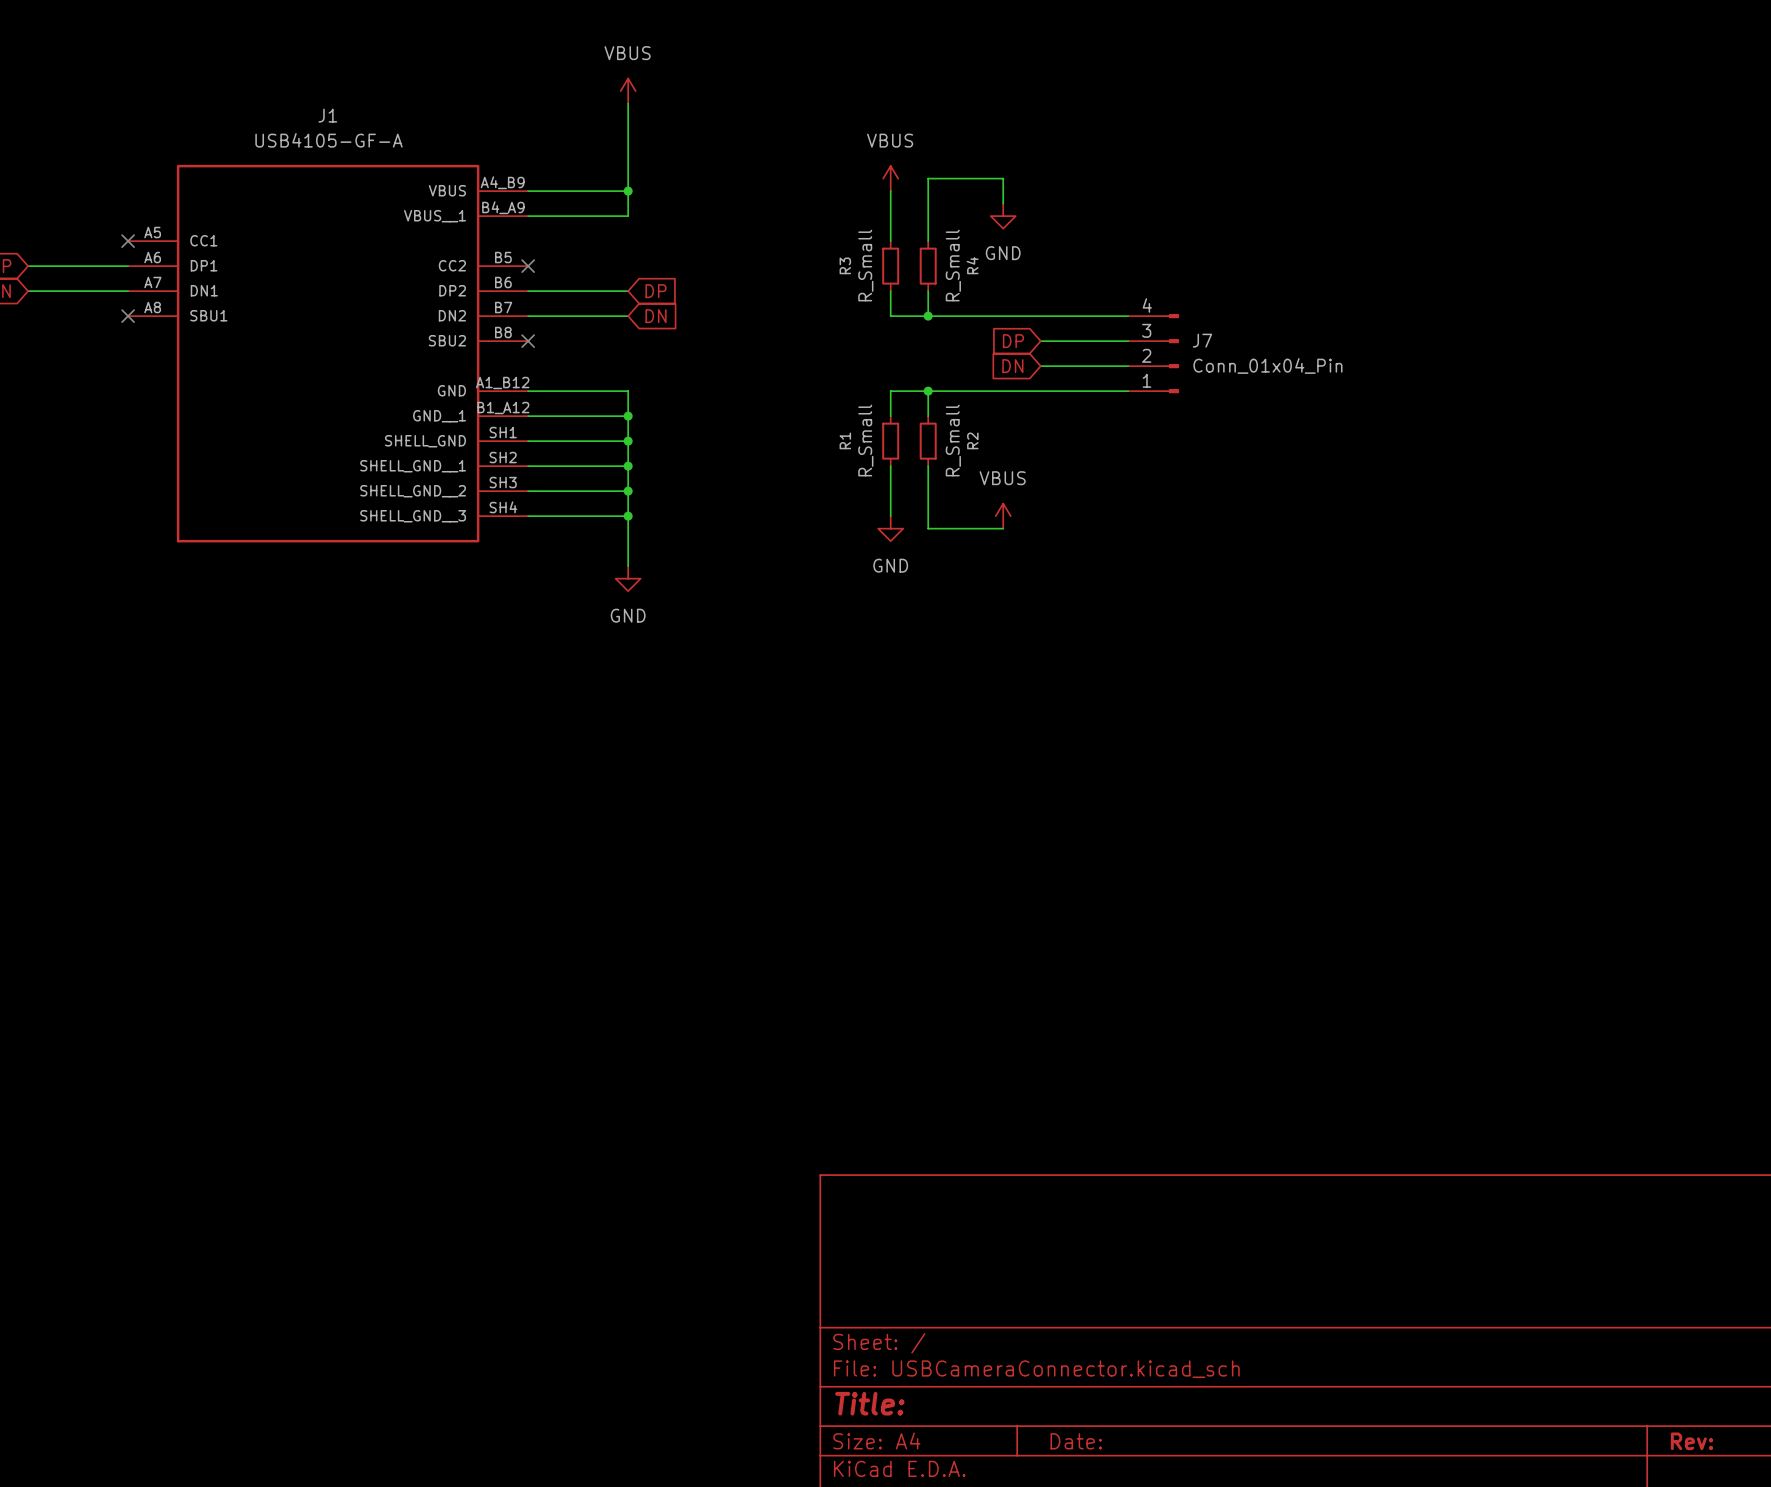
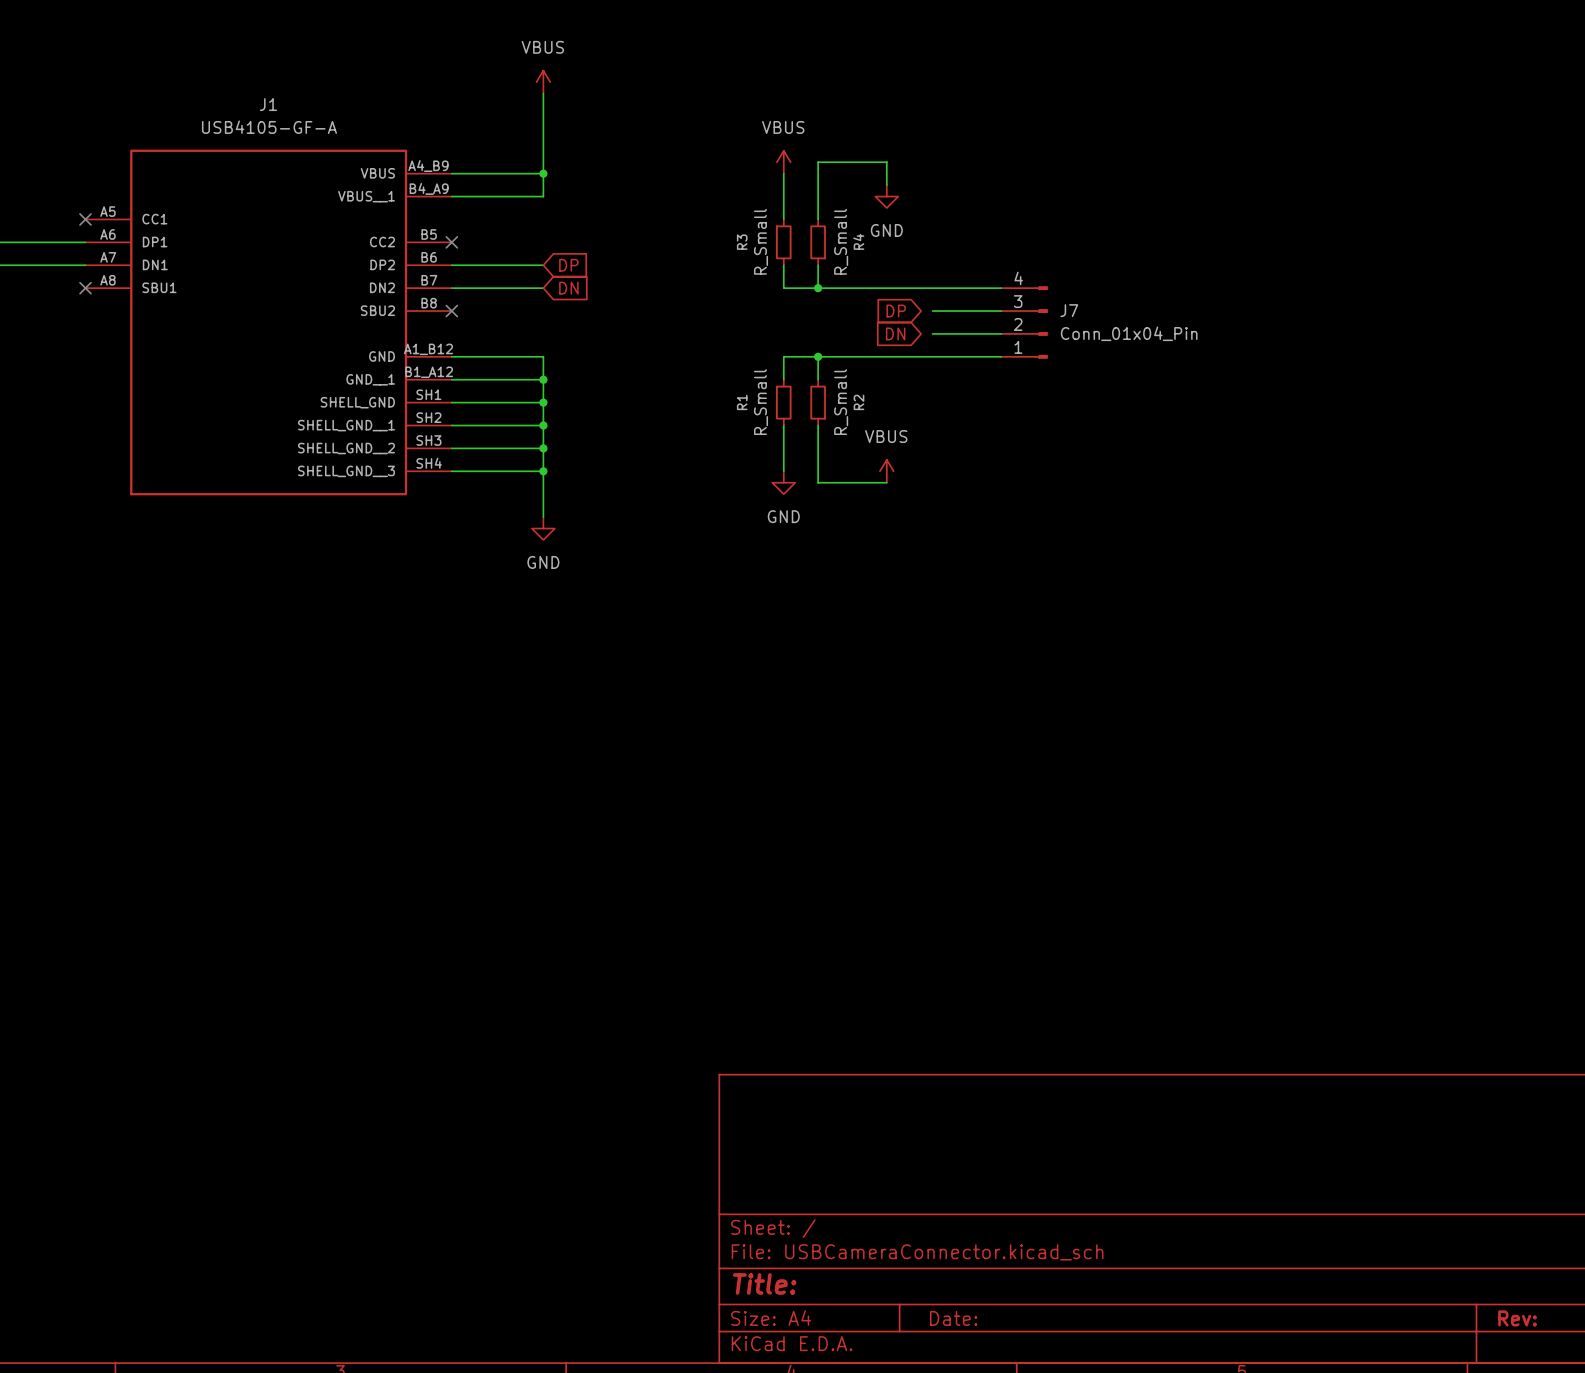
wire: (1040, 341) (1053, 341) -> none
wire: (1040, 366) (1053, 366) -> none

